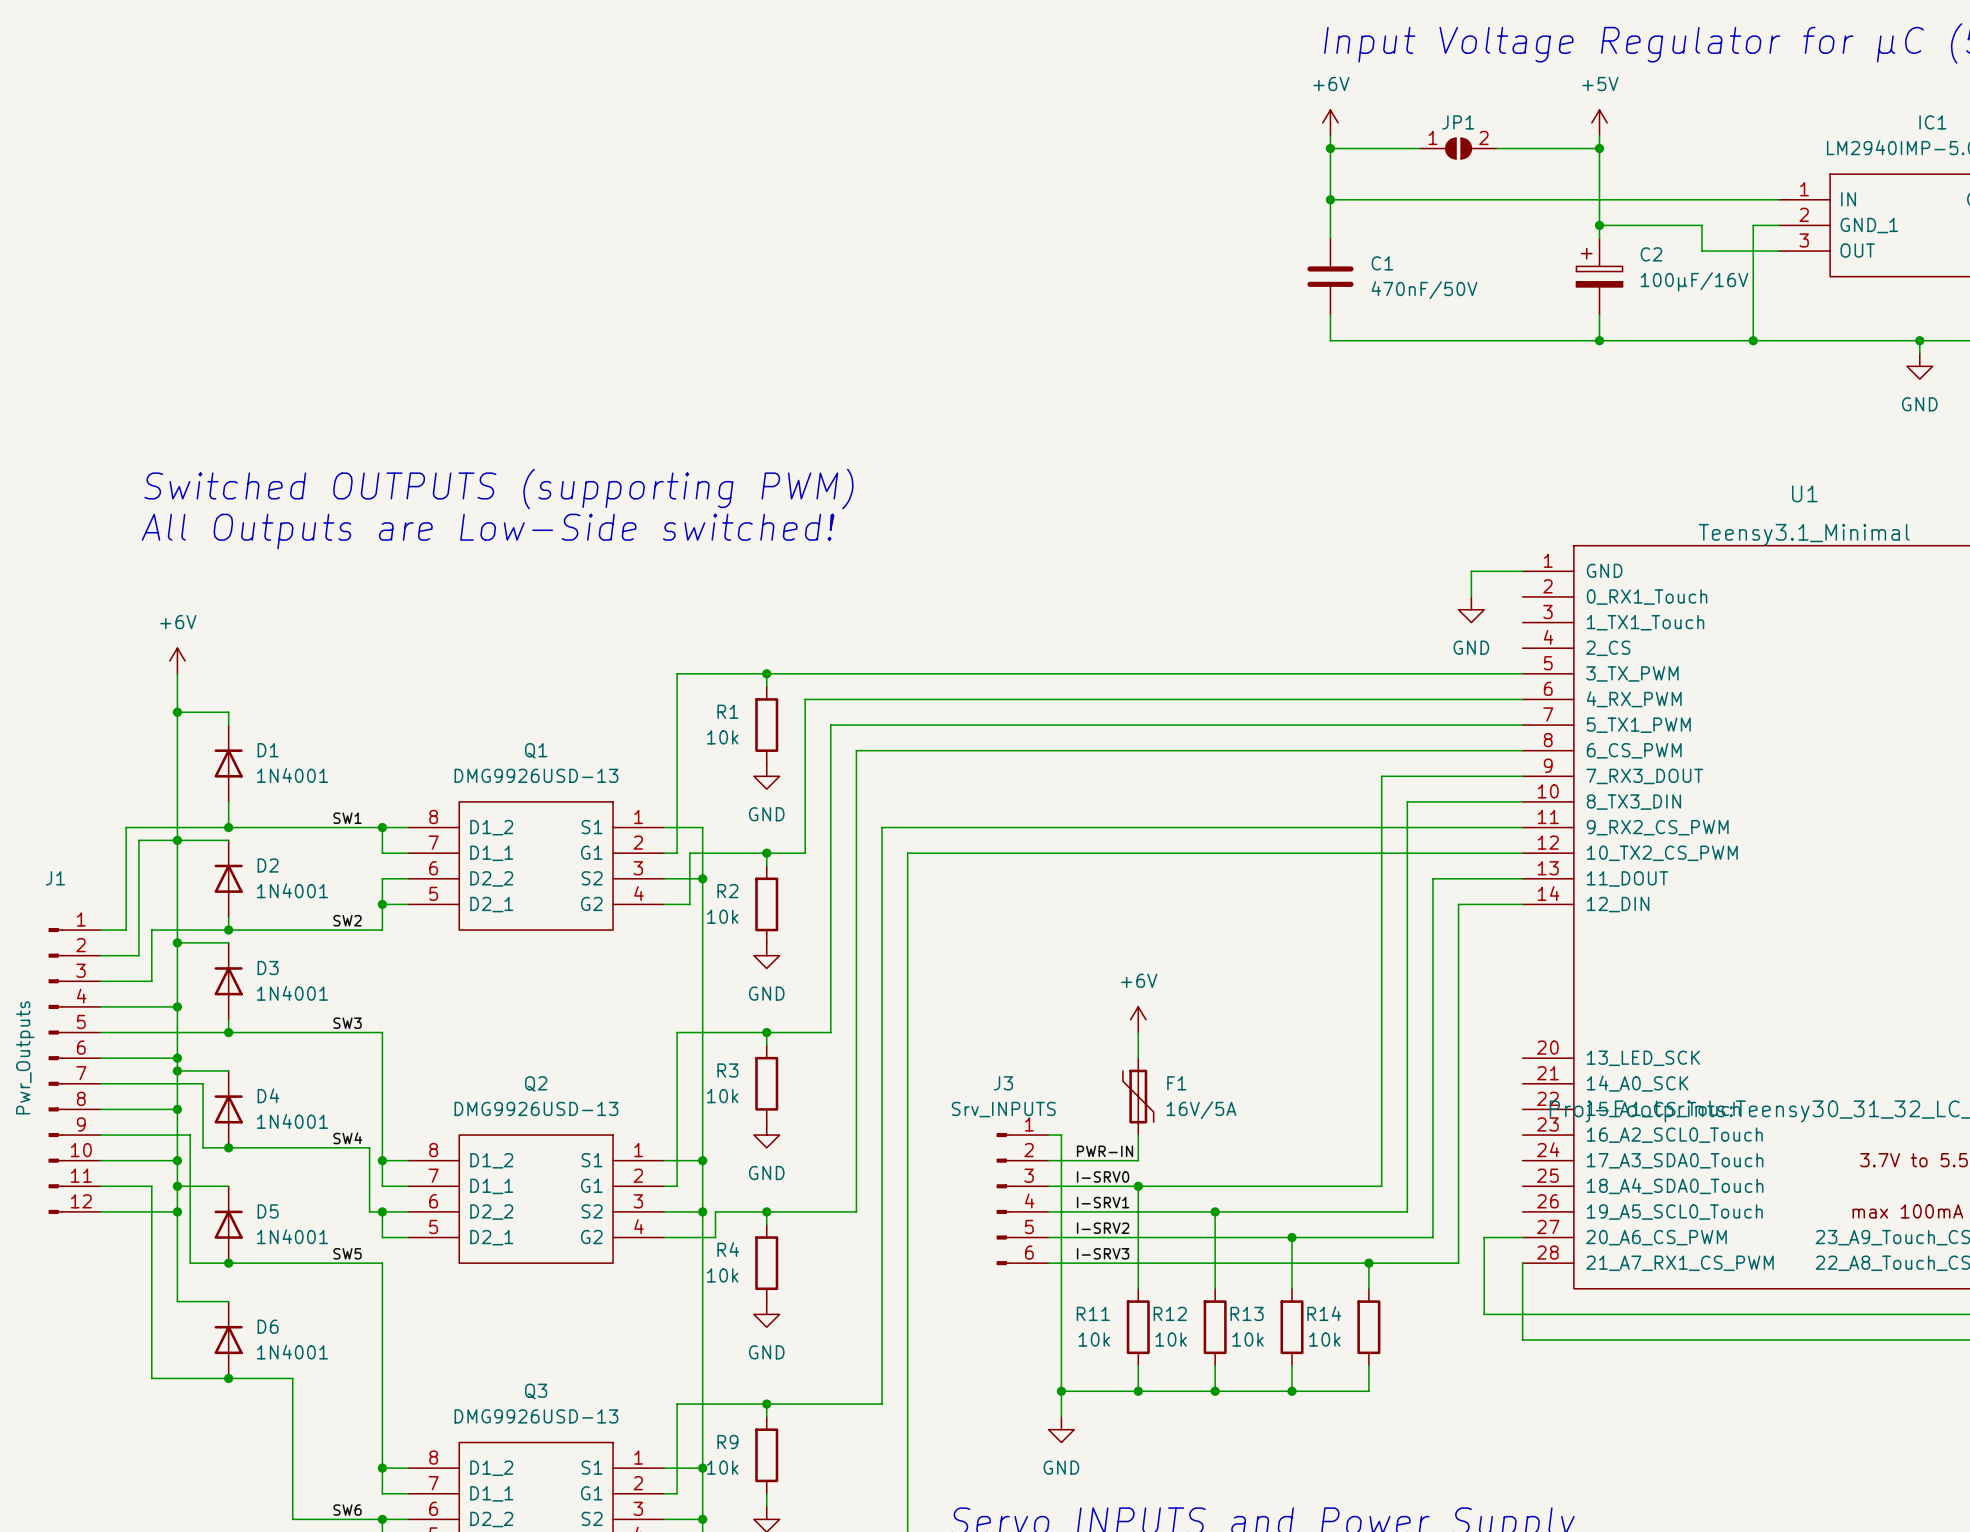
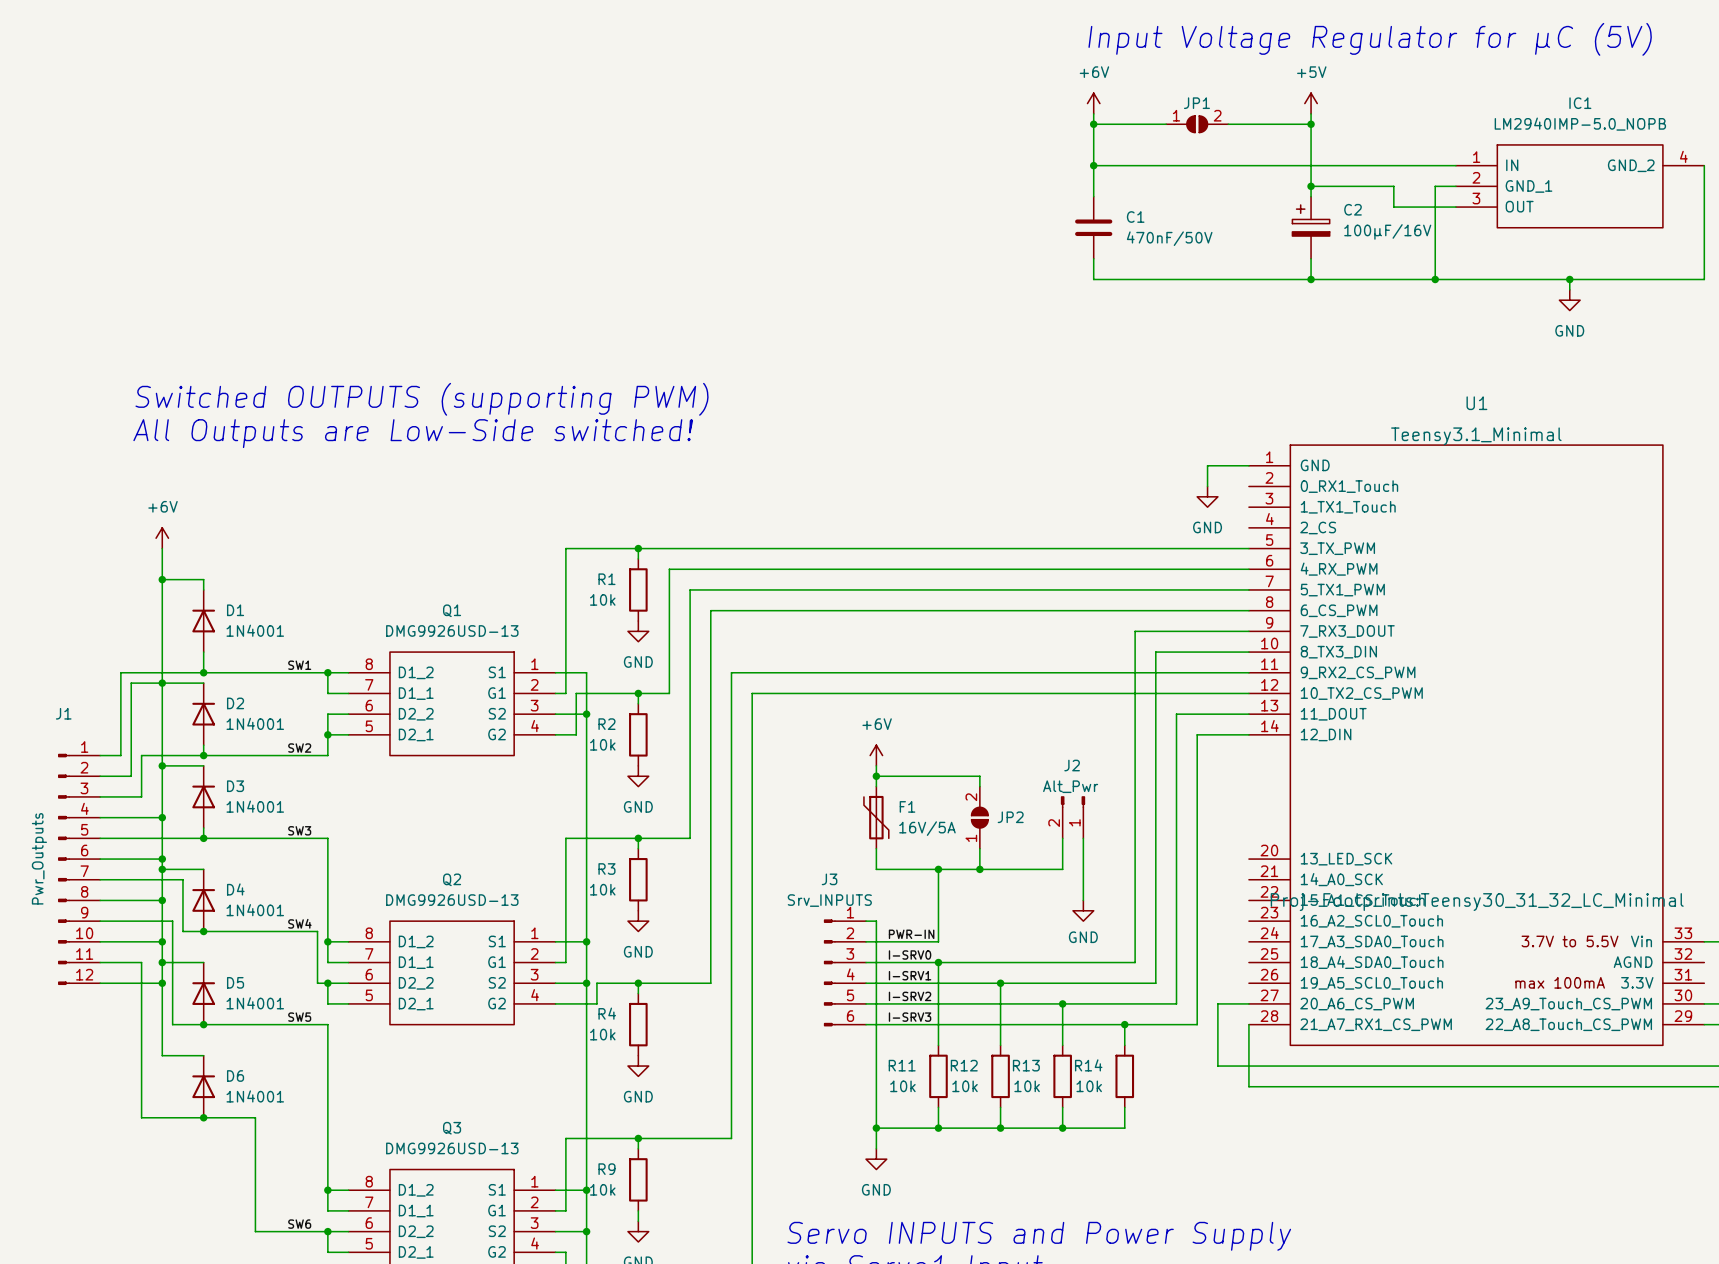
wire: none -> (876, 765) (876, 786)
wire: none -> (876, 776) (979, 776) (979, 786)
junction: none -> (876, 776)
JP2: none -> (979, 817)
J2: none -> Alt_Pwr (1073, 817)
power symbol position: +6V (1138, 1019) -> +6V (876, 755)
wire: (1138, 1032) (1138, 1058) -> (979, 848) (979, 869)
wire: none -> (1062, 838) (1062, 869) (876, 869) (876, 848)
wire: none -> (1083, 838) (1083, 900)
junction: none -> (938, 869)
junction: none -> (979, 869)
F1 position: (1138, 1096) -> (876, 817)
power symbol: none -> GND (1083, 910)

